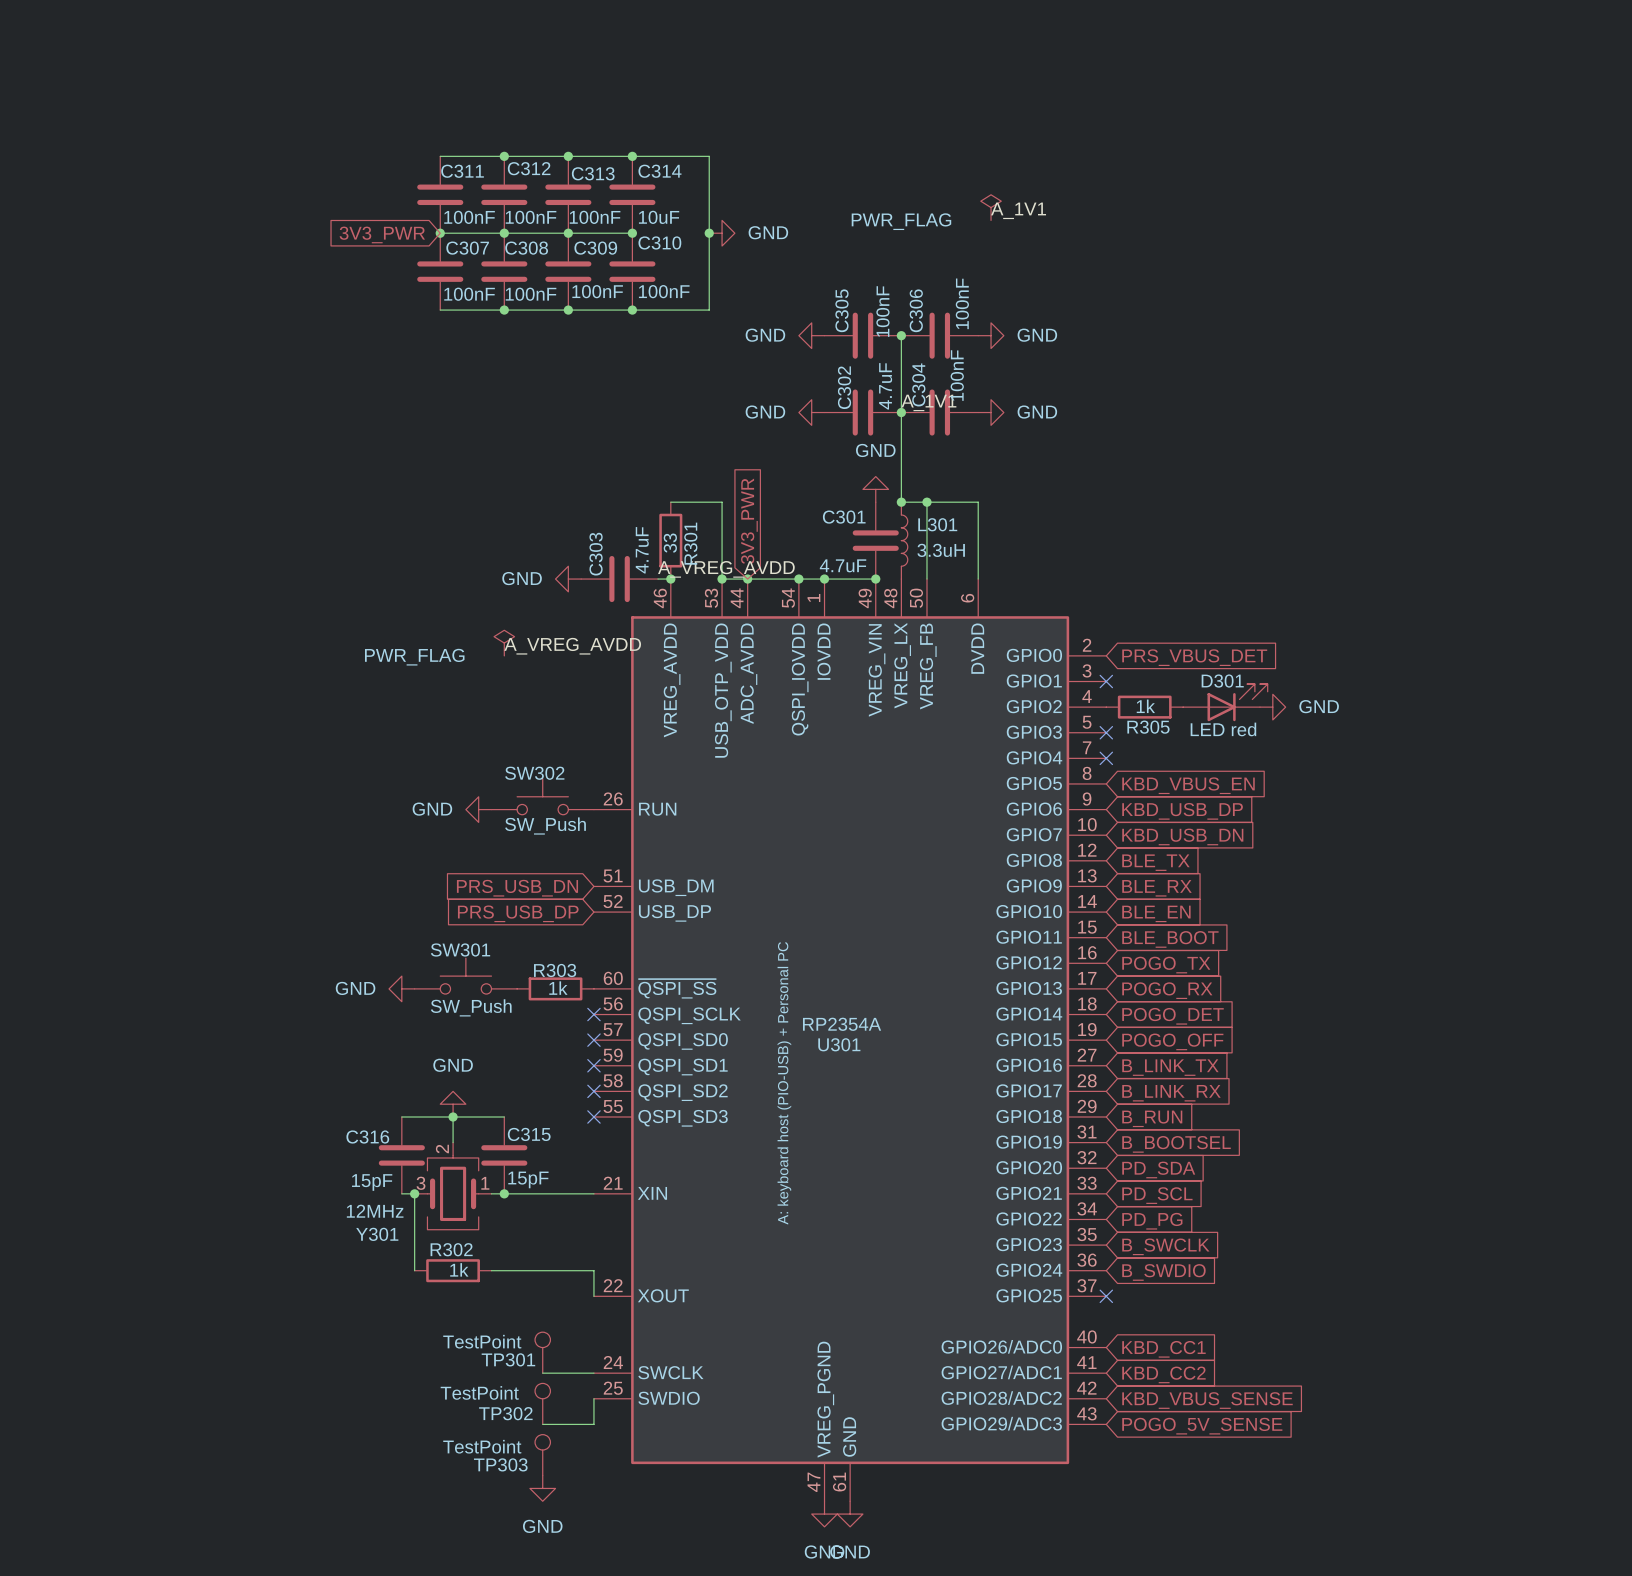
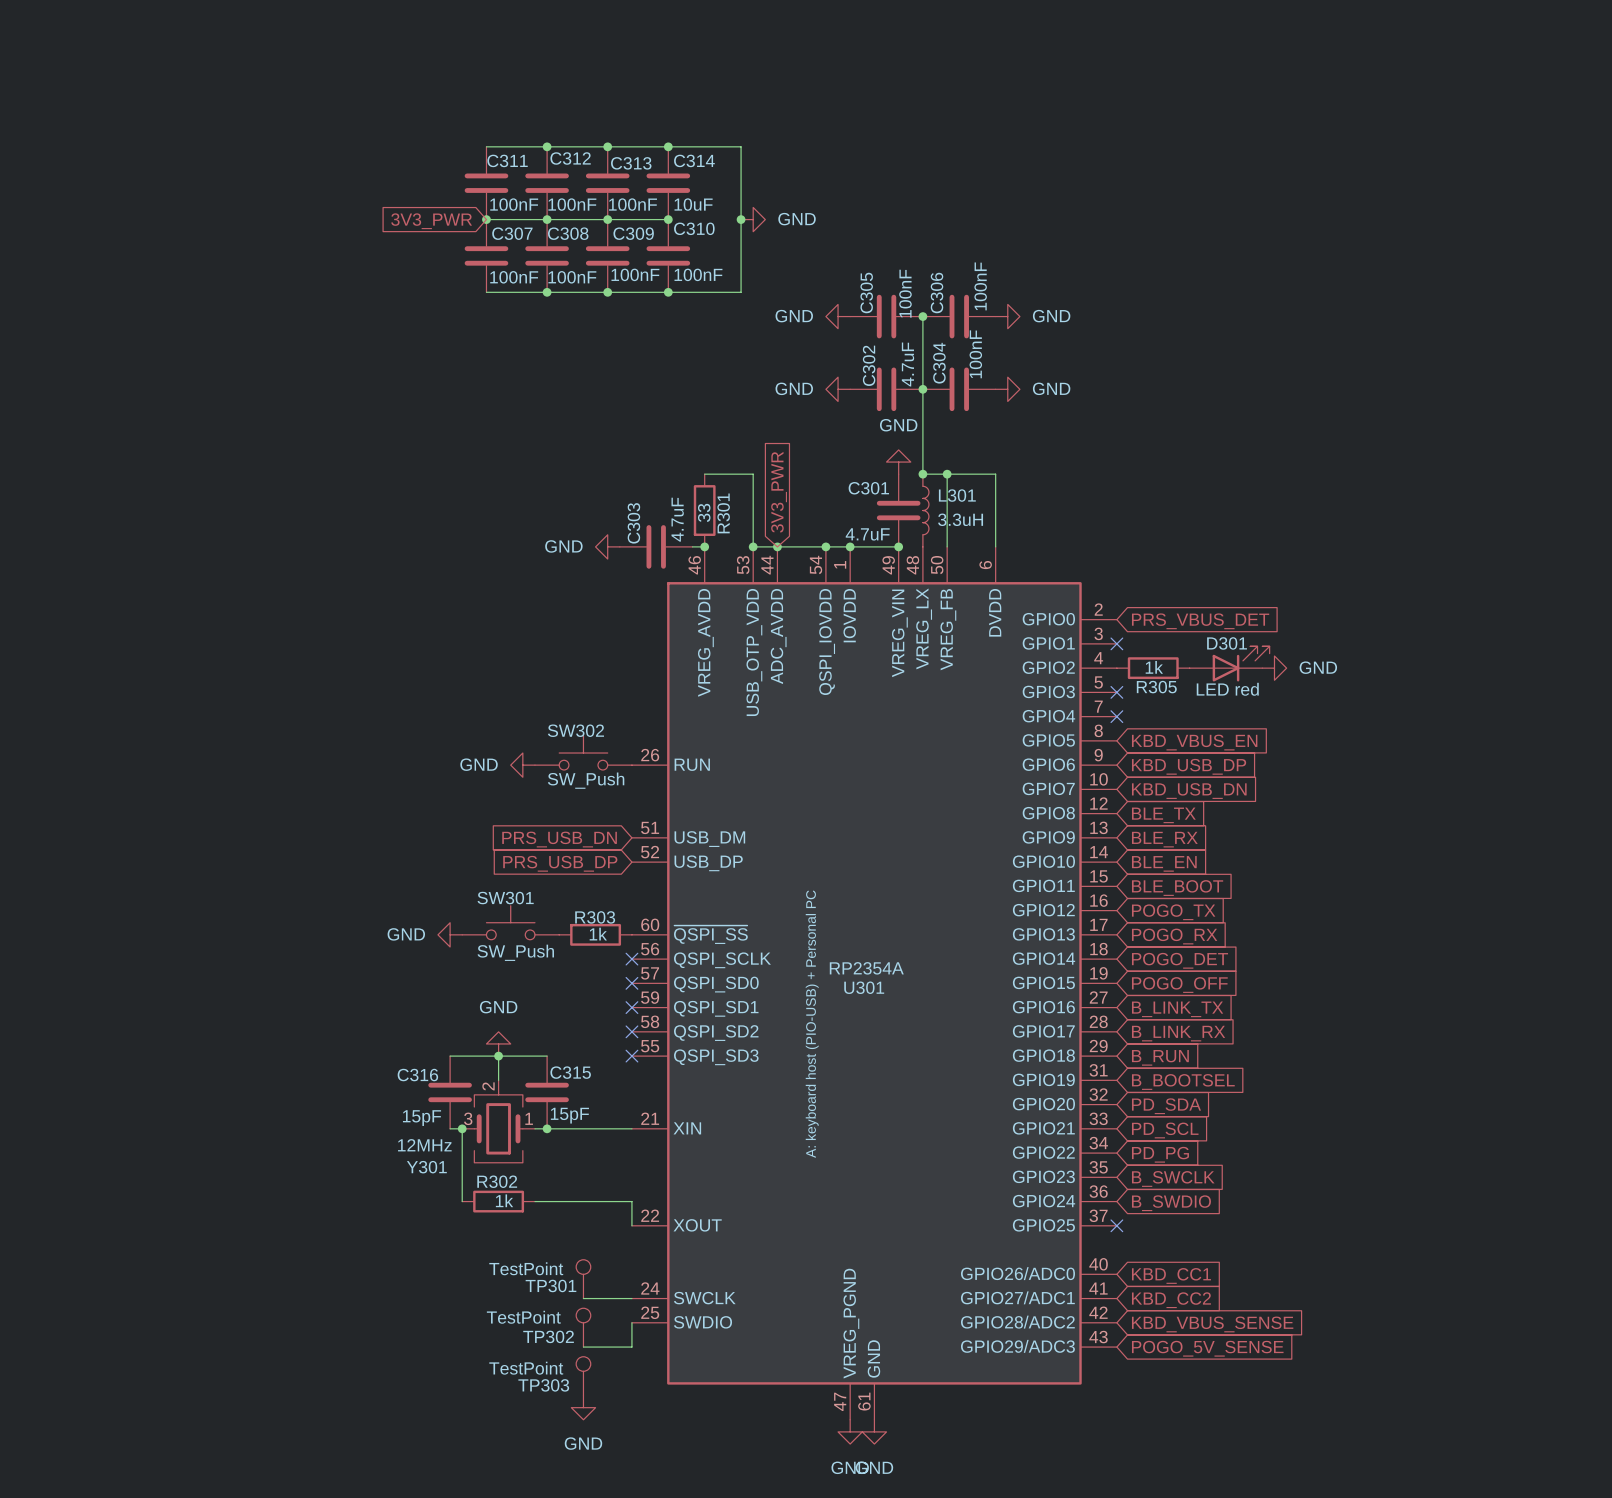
power symbol: PWR_FLAG (991, 207) -> none
label: A_1V1 (1018, 210) -> none
label: A_1V1 (928, 402) -> none
label: A_VREG_AVDD (726, 569) -> none
power symbol: PWR_FLAG (504, 643) -> none
label: A_VREG_AVDD (572, 646) -> none

